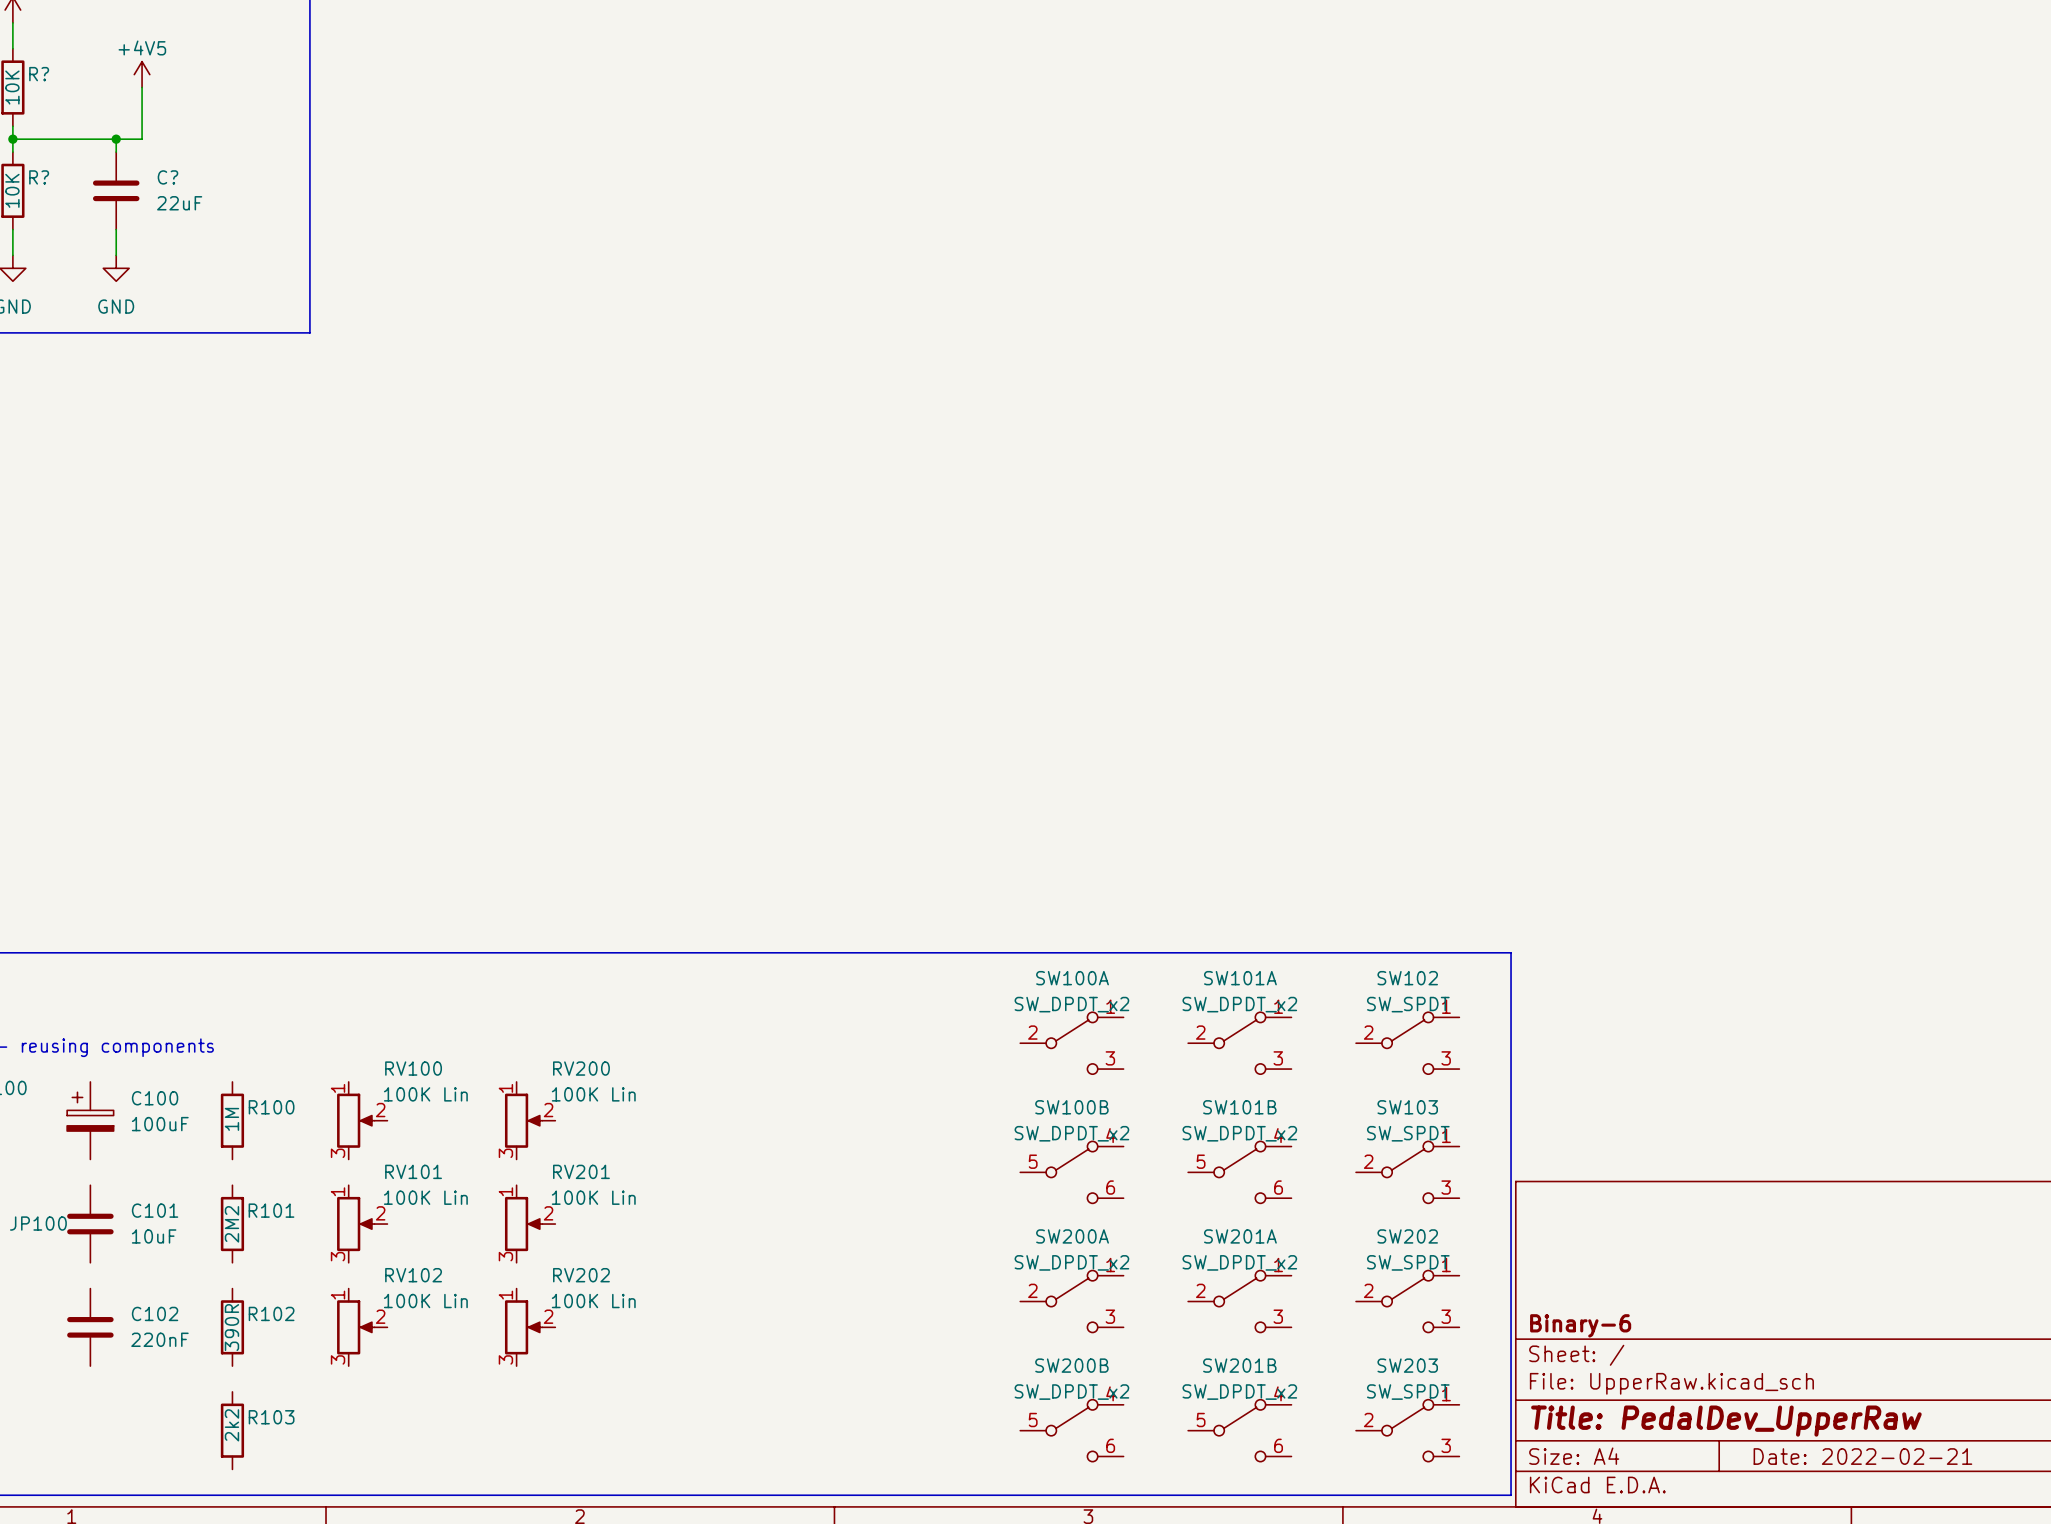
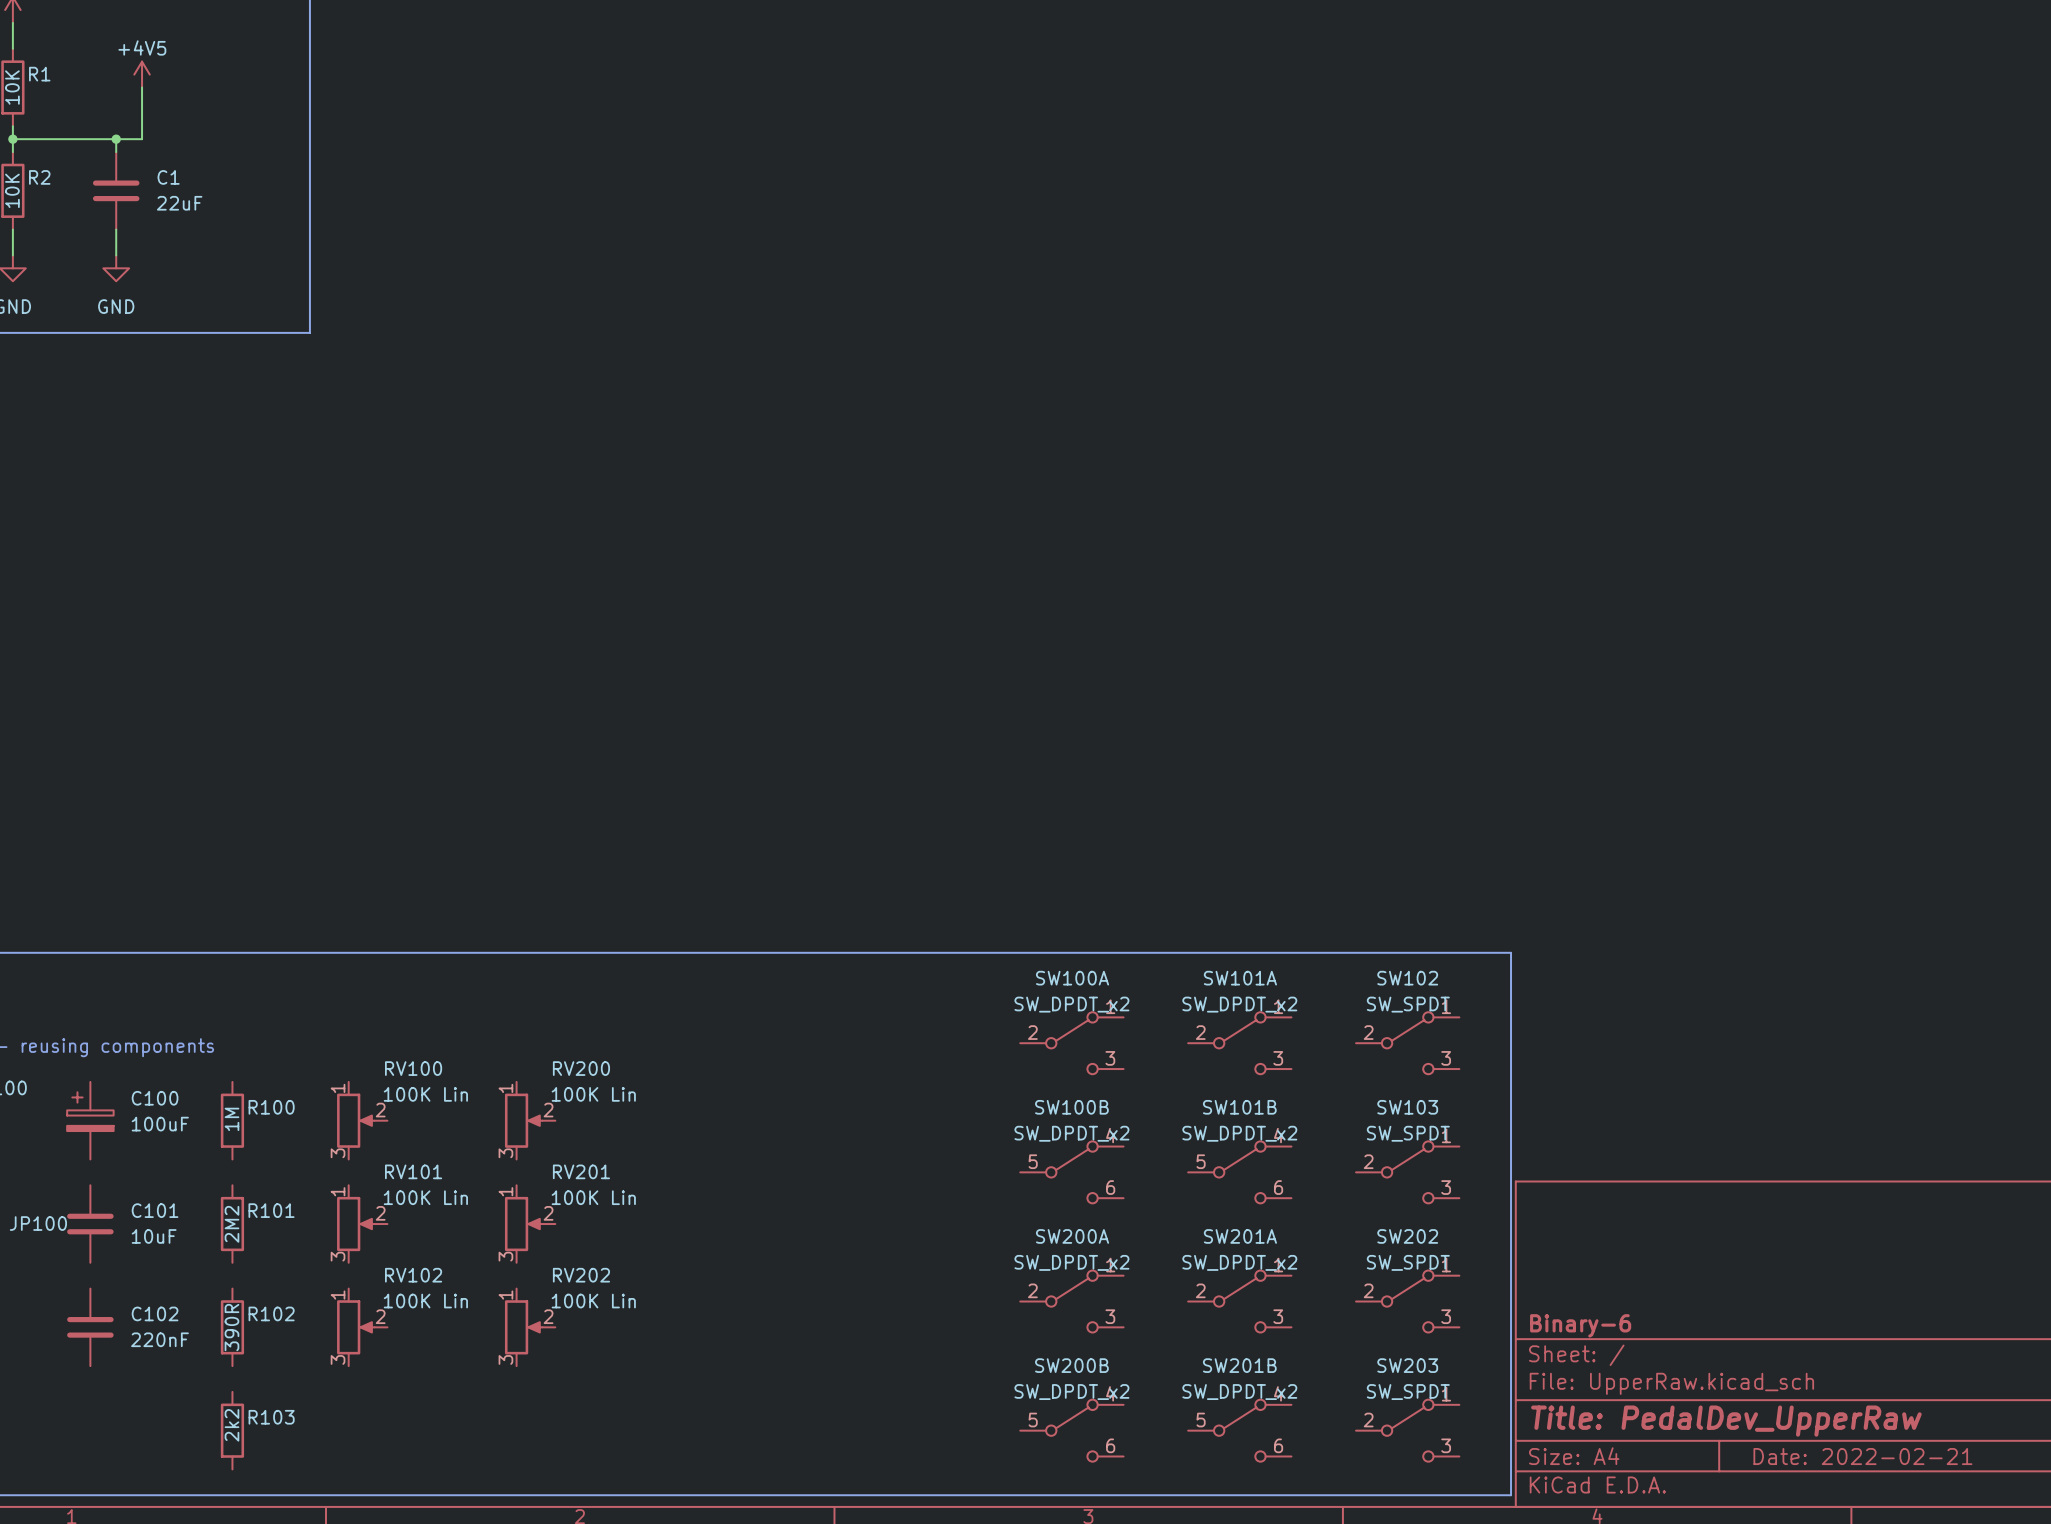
R? name: R? (39, 74) -> R1 (39, 74)
R? name: R? (39, 177) -> R2 (39, 177)
C? name: C? (167, 177) -> C1 (168, 177)

